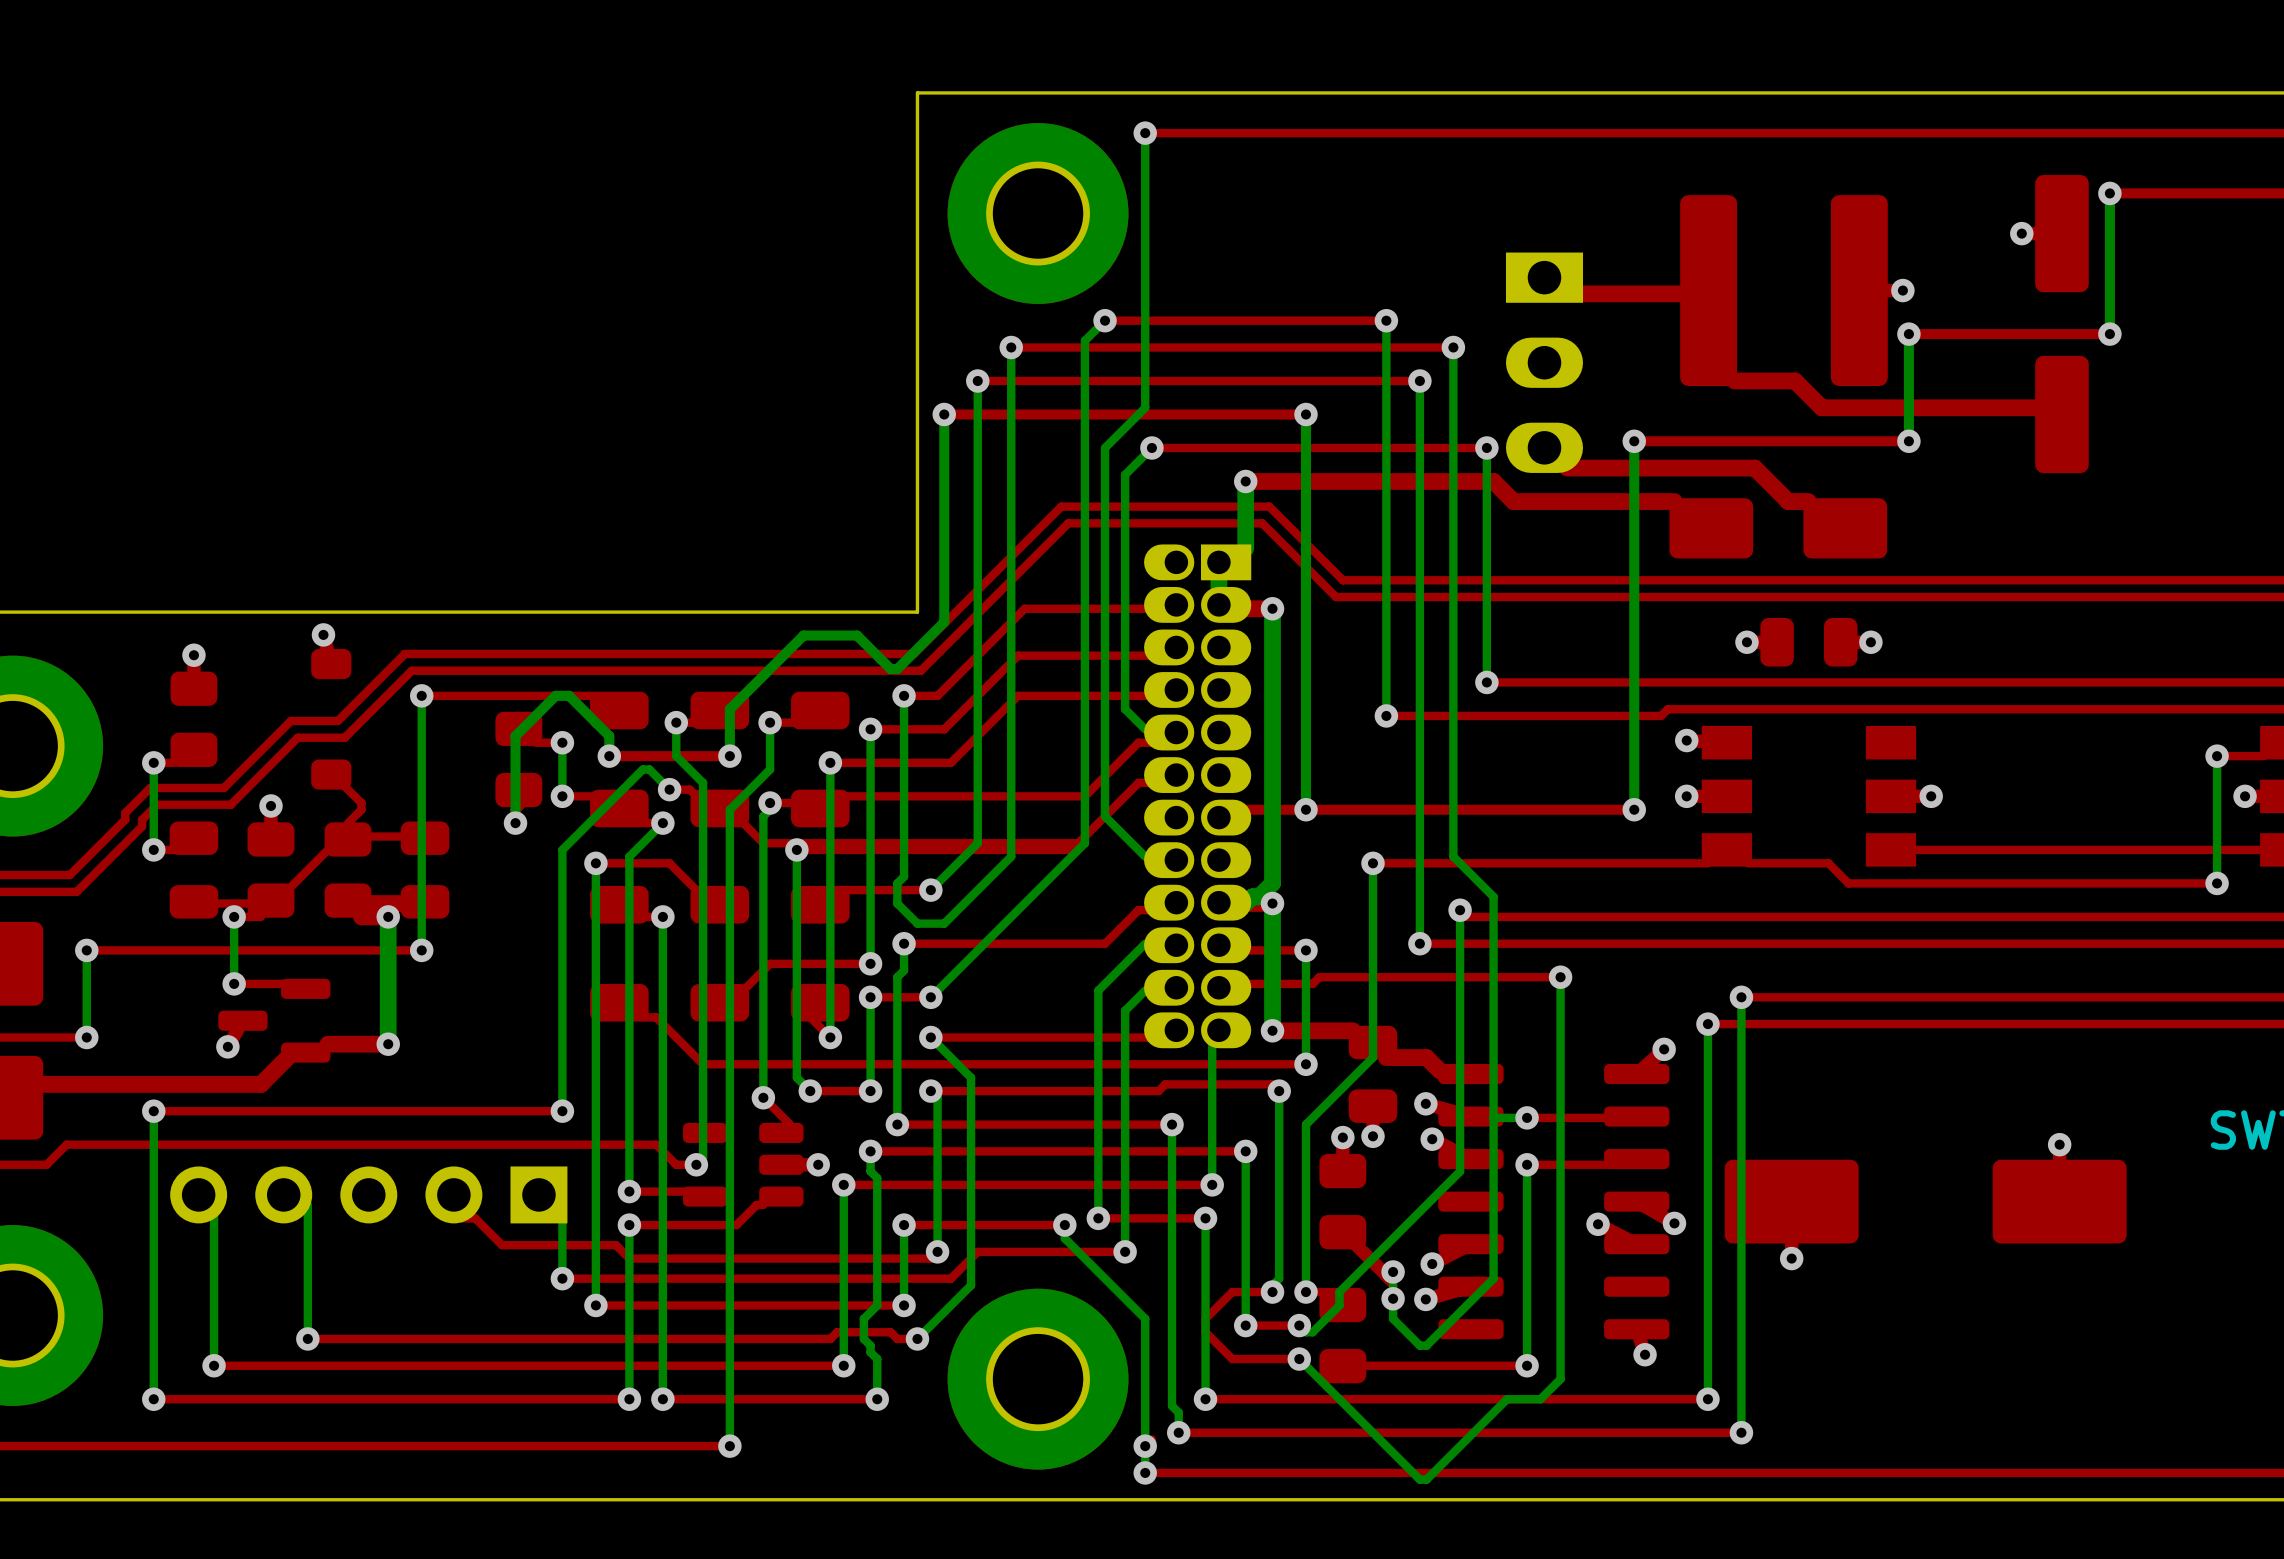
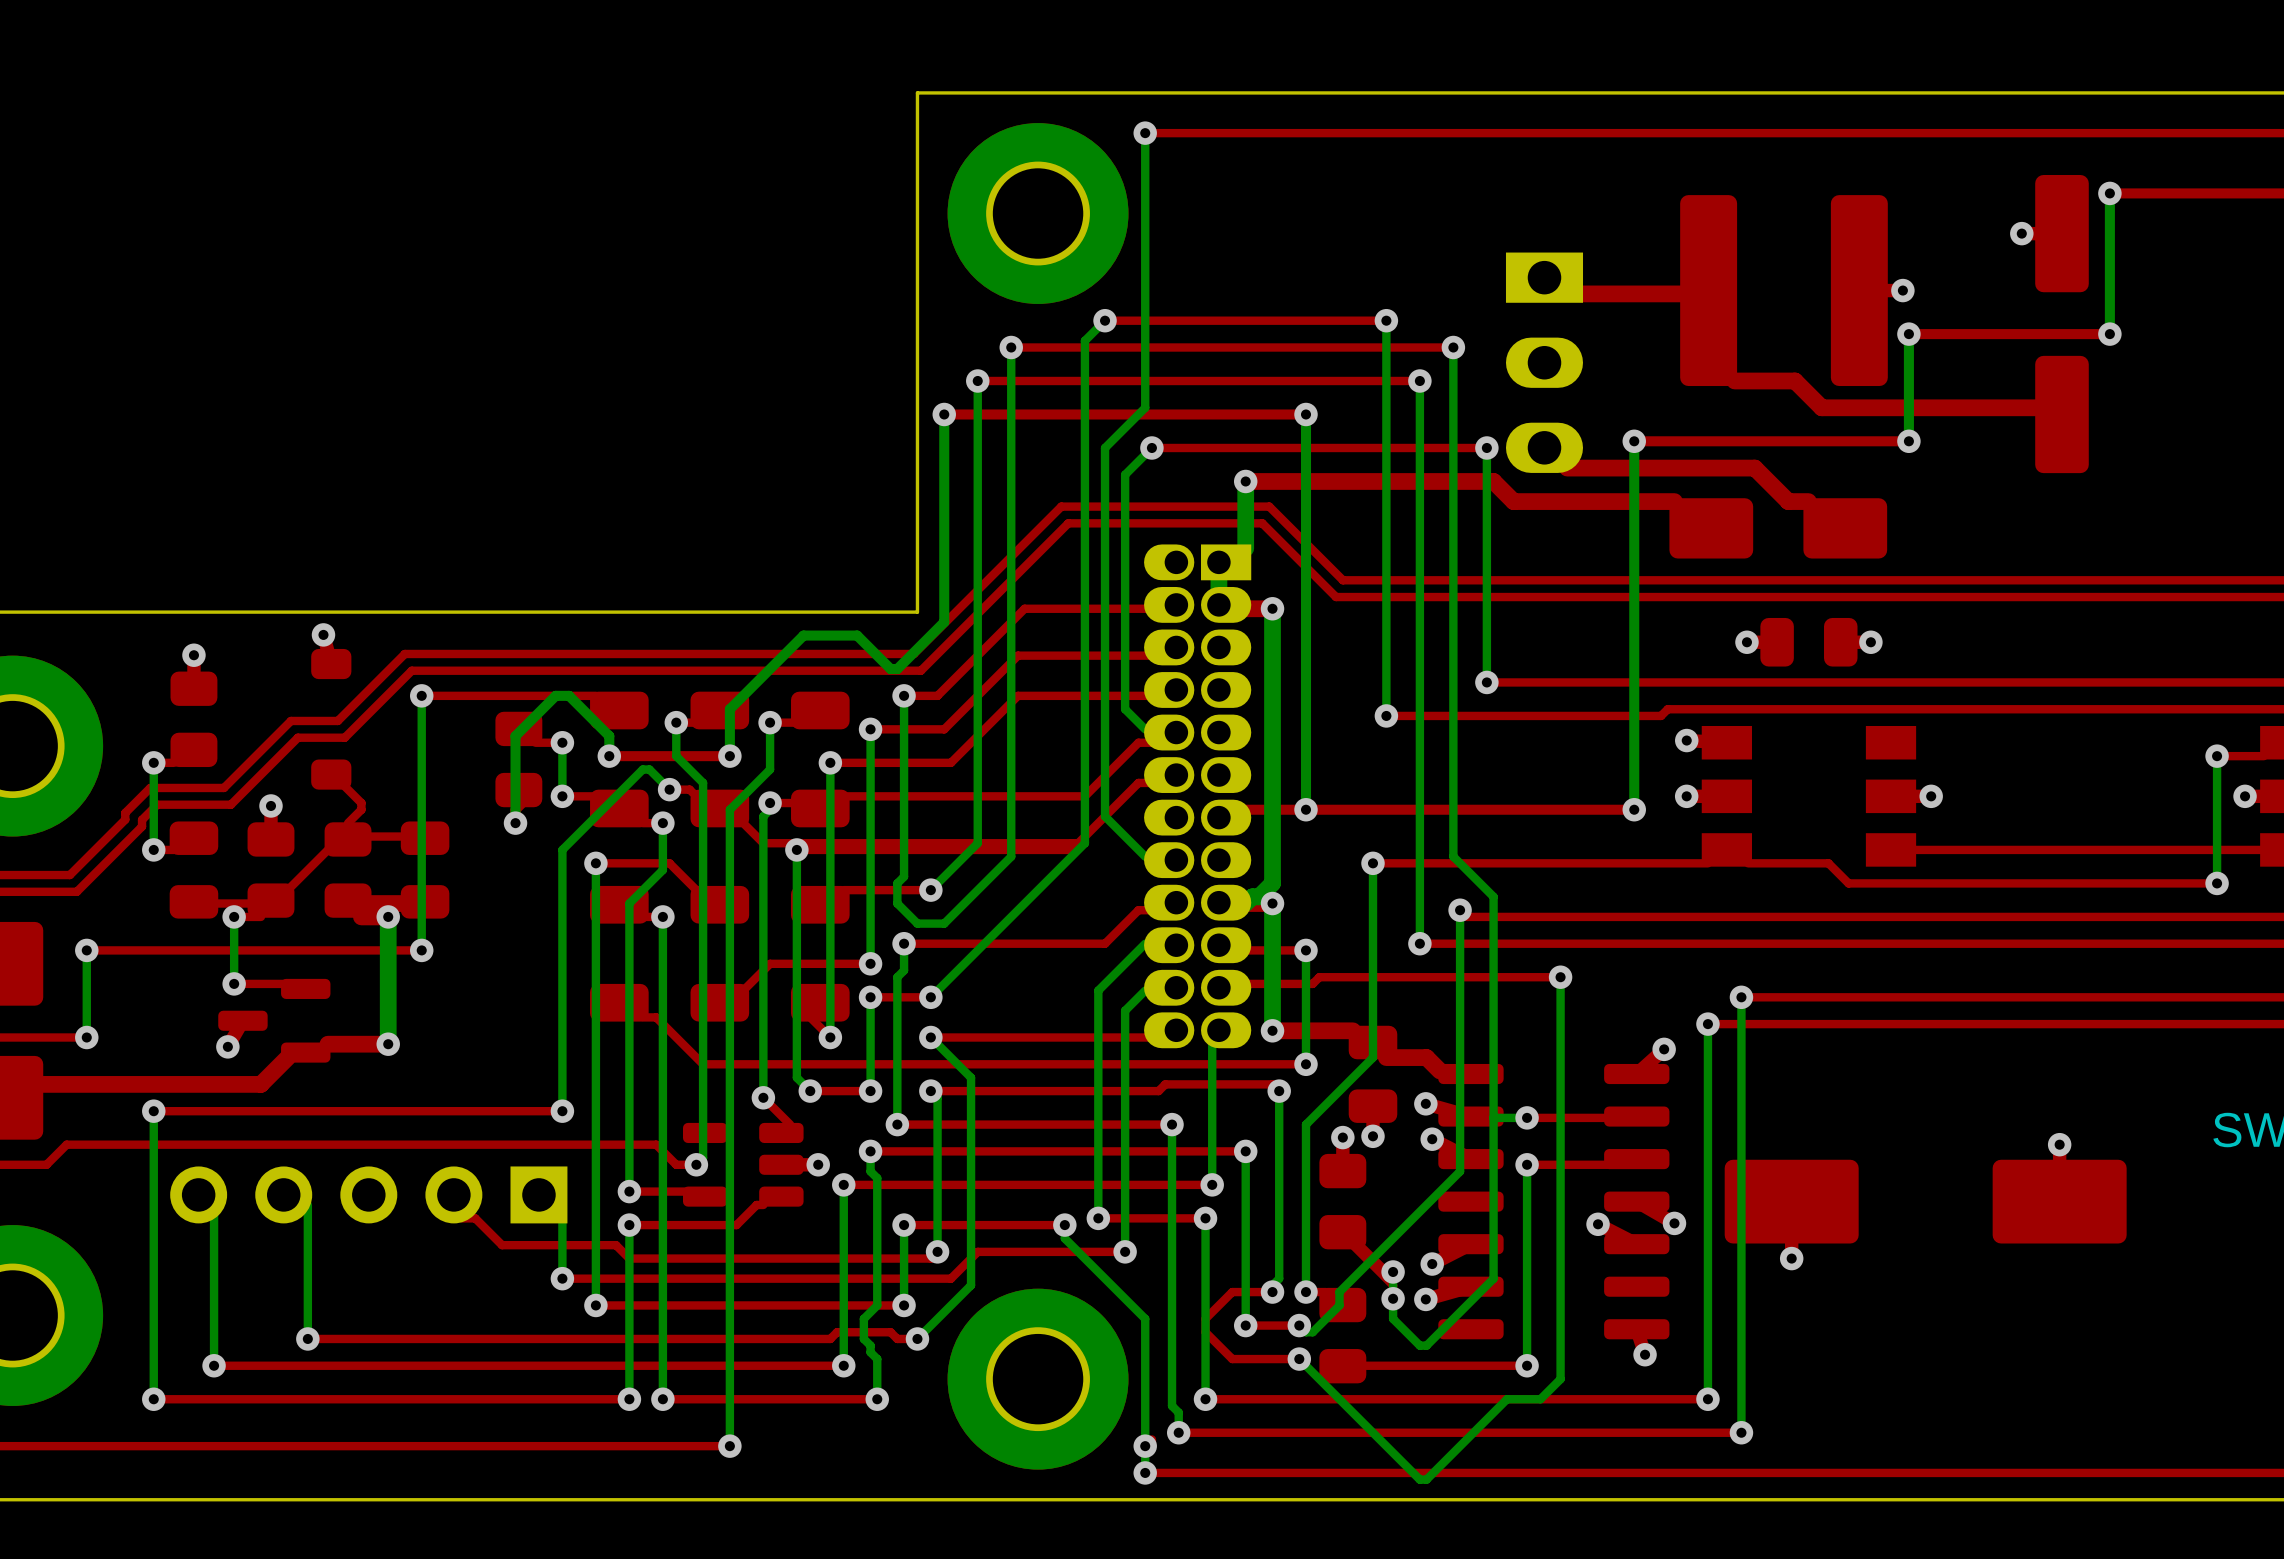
bottom track: (662, 823) (629, 856) (629, 903) -> (662, 823) (662, 870) (629, 903)

